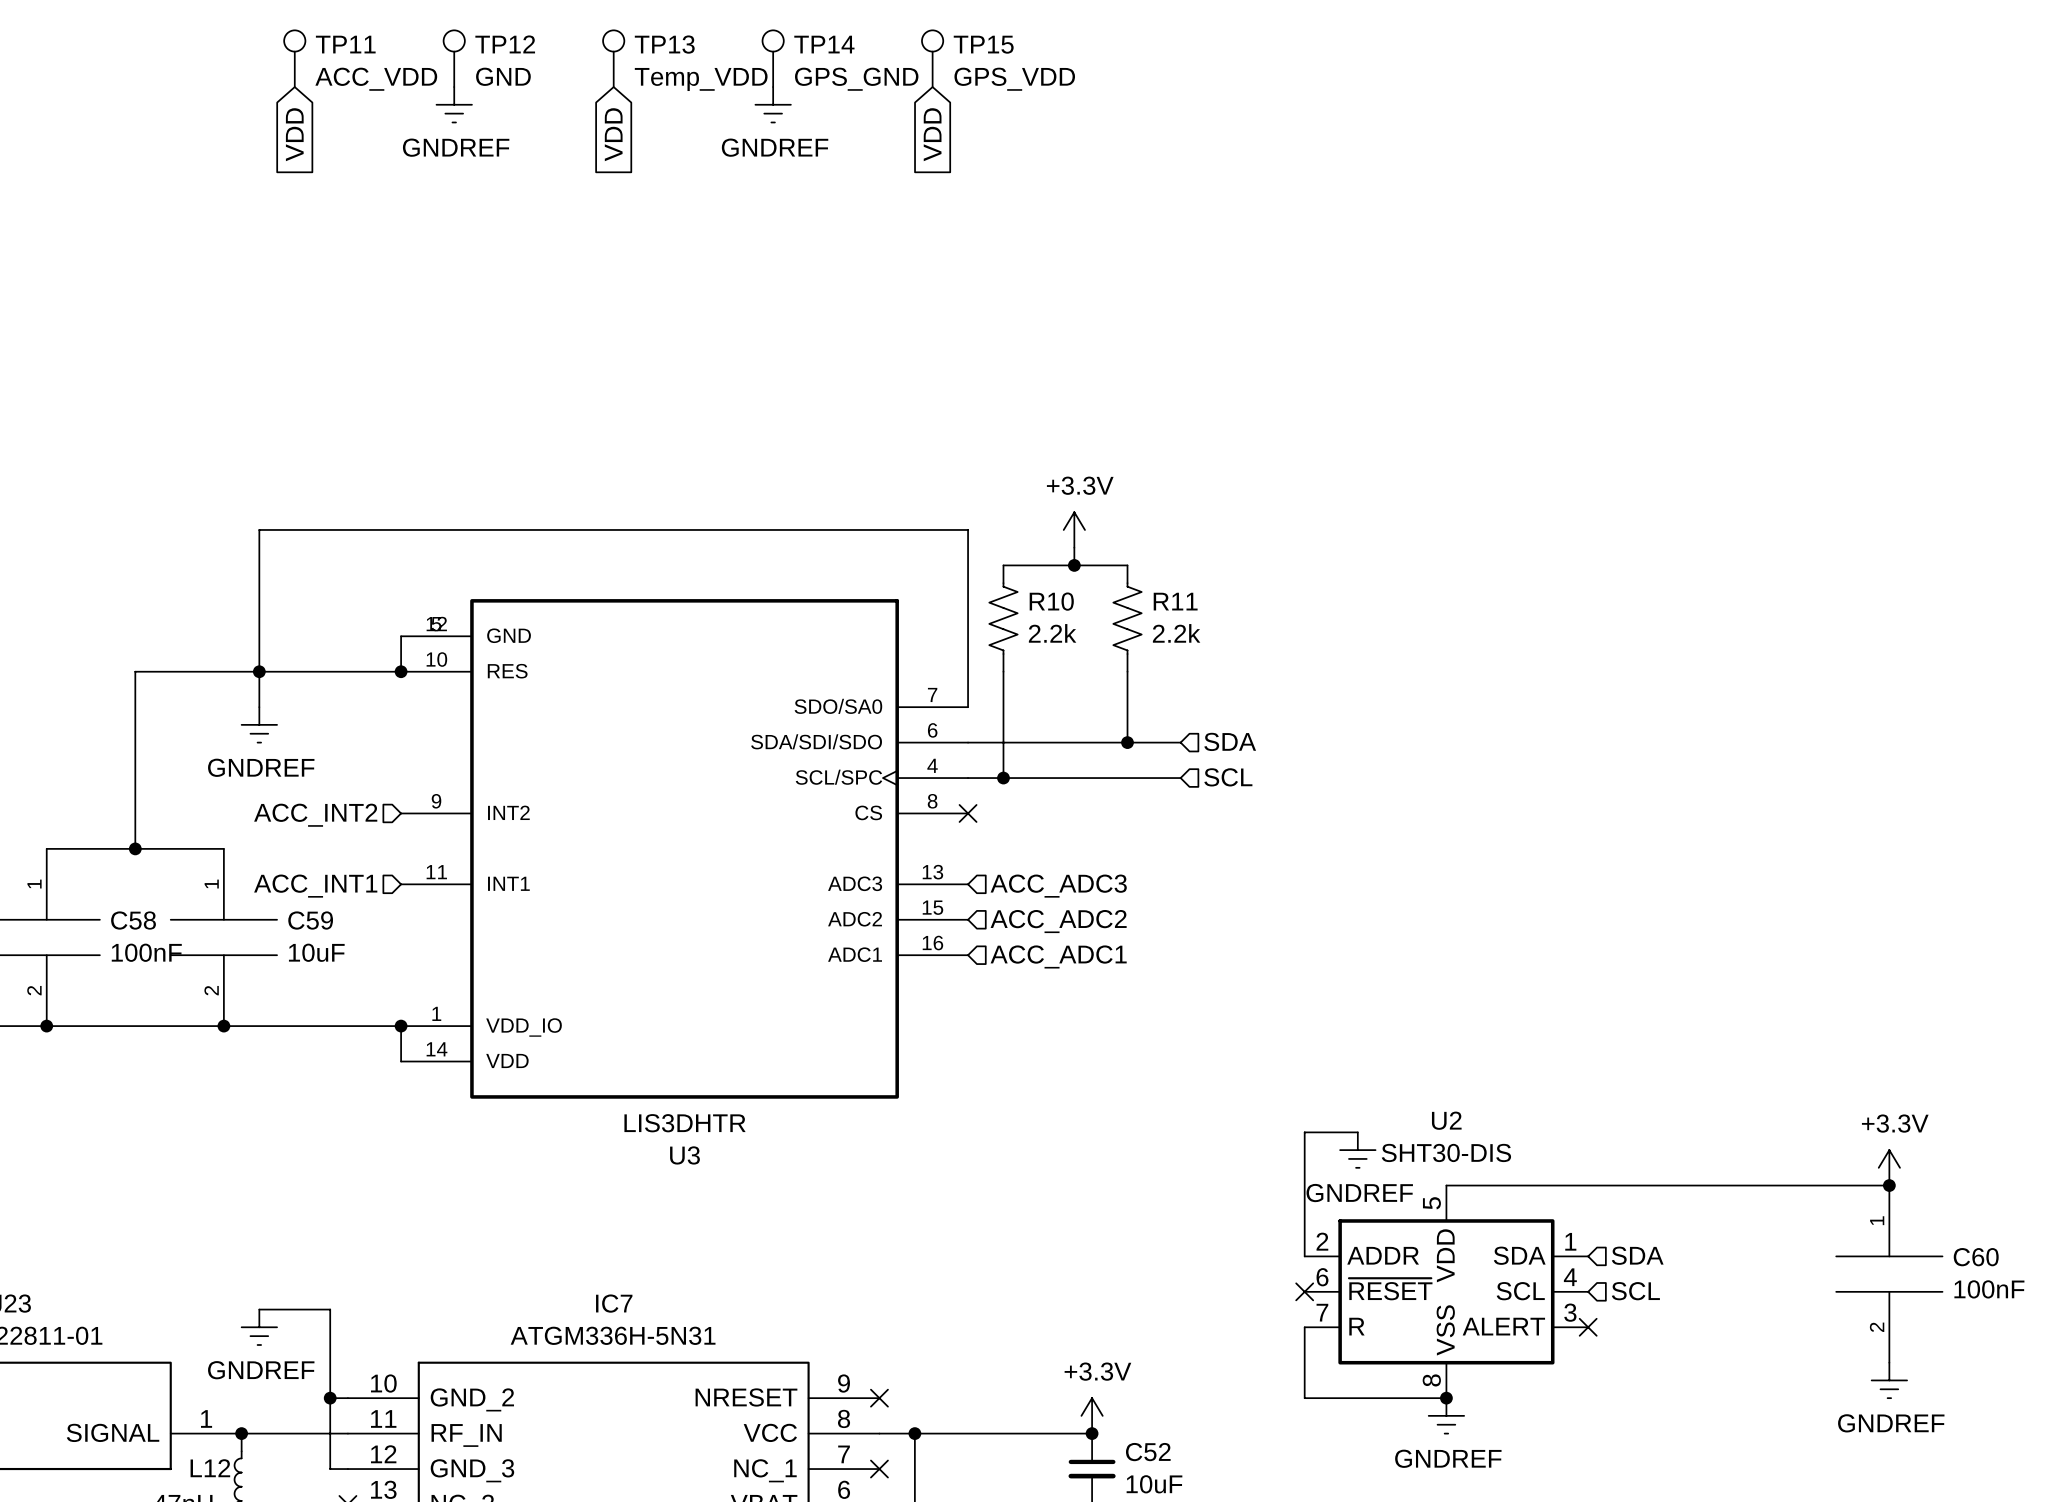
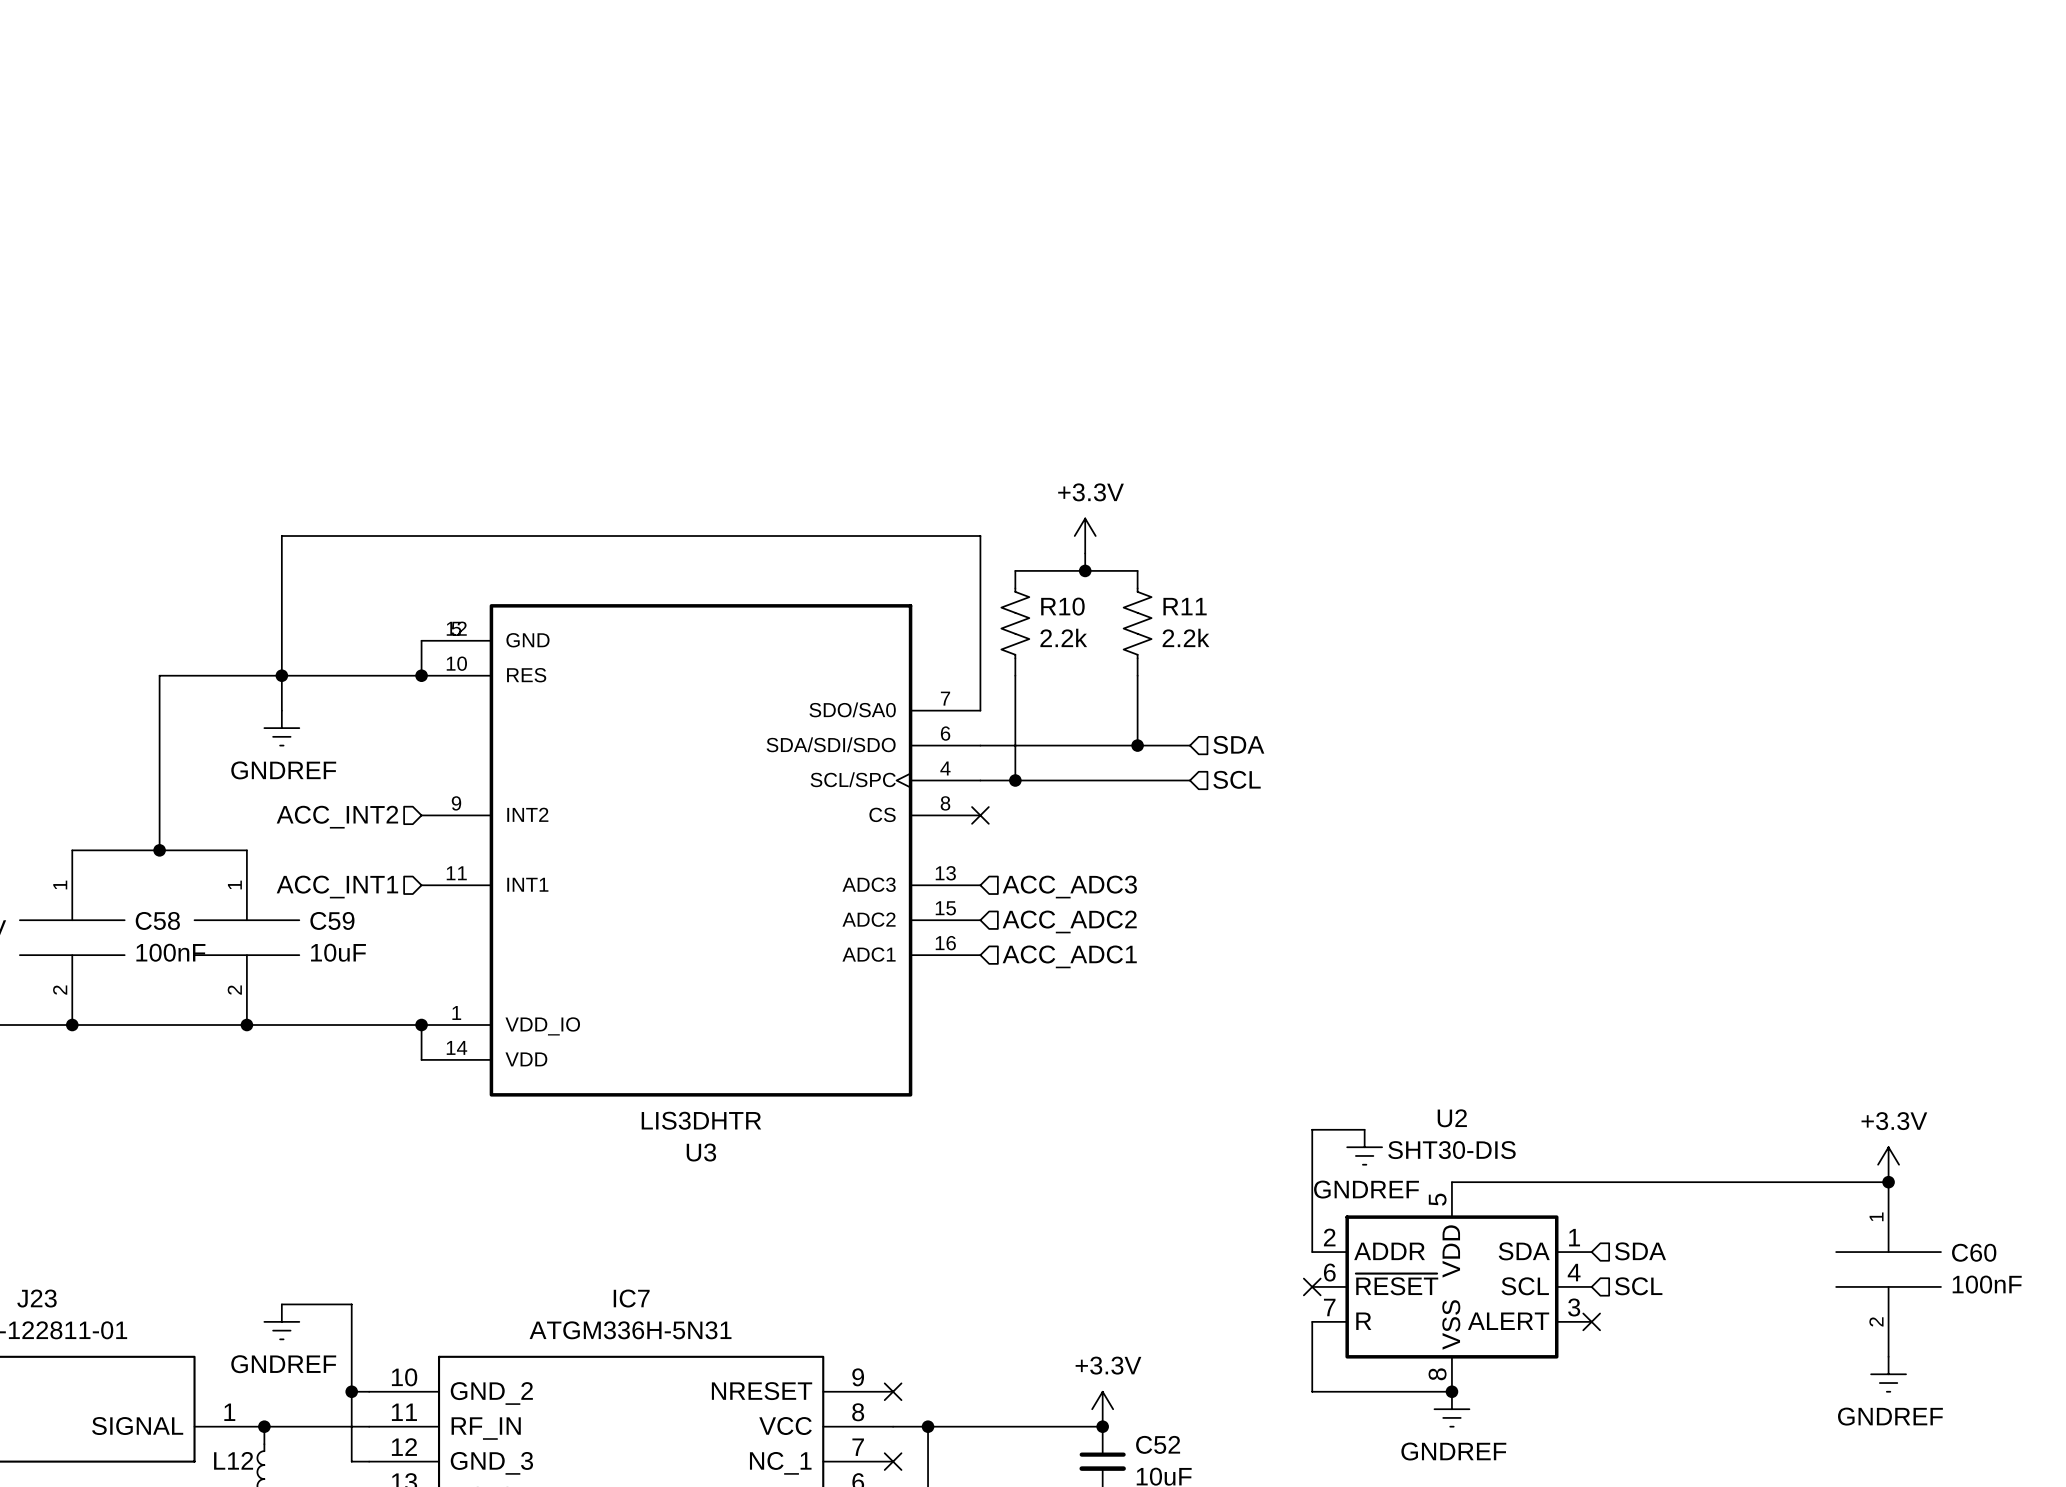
TP11: ACC_VDD (294, 58) -> none
TP12: GND (454, 58) -> none
TP13: Temp_VDD (613, 58) -> none
TP14: GPS_GND (773, 58) -> none
TP15: GPS_VDD (932, 58) -> none
power symbol: GNDREF (454, 104) -> none
power symbol: GNDREF (773, 104) -> none
global label: VDD (294, 134) -> none
global label: VDD (613, 134) -> none
global label: VDD (932, 134) -> none

